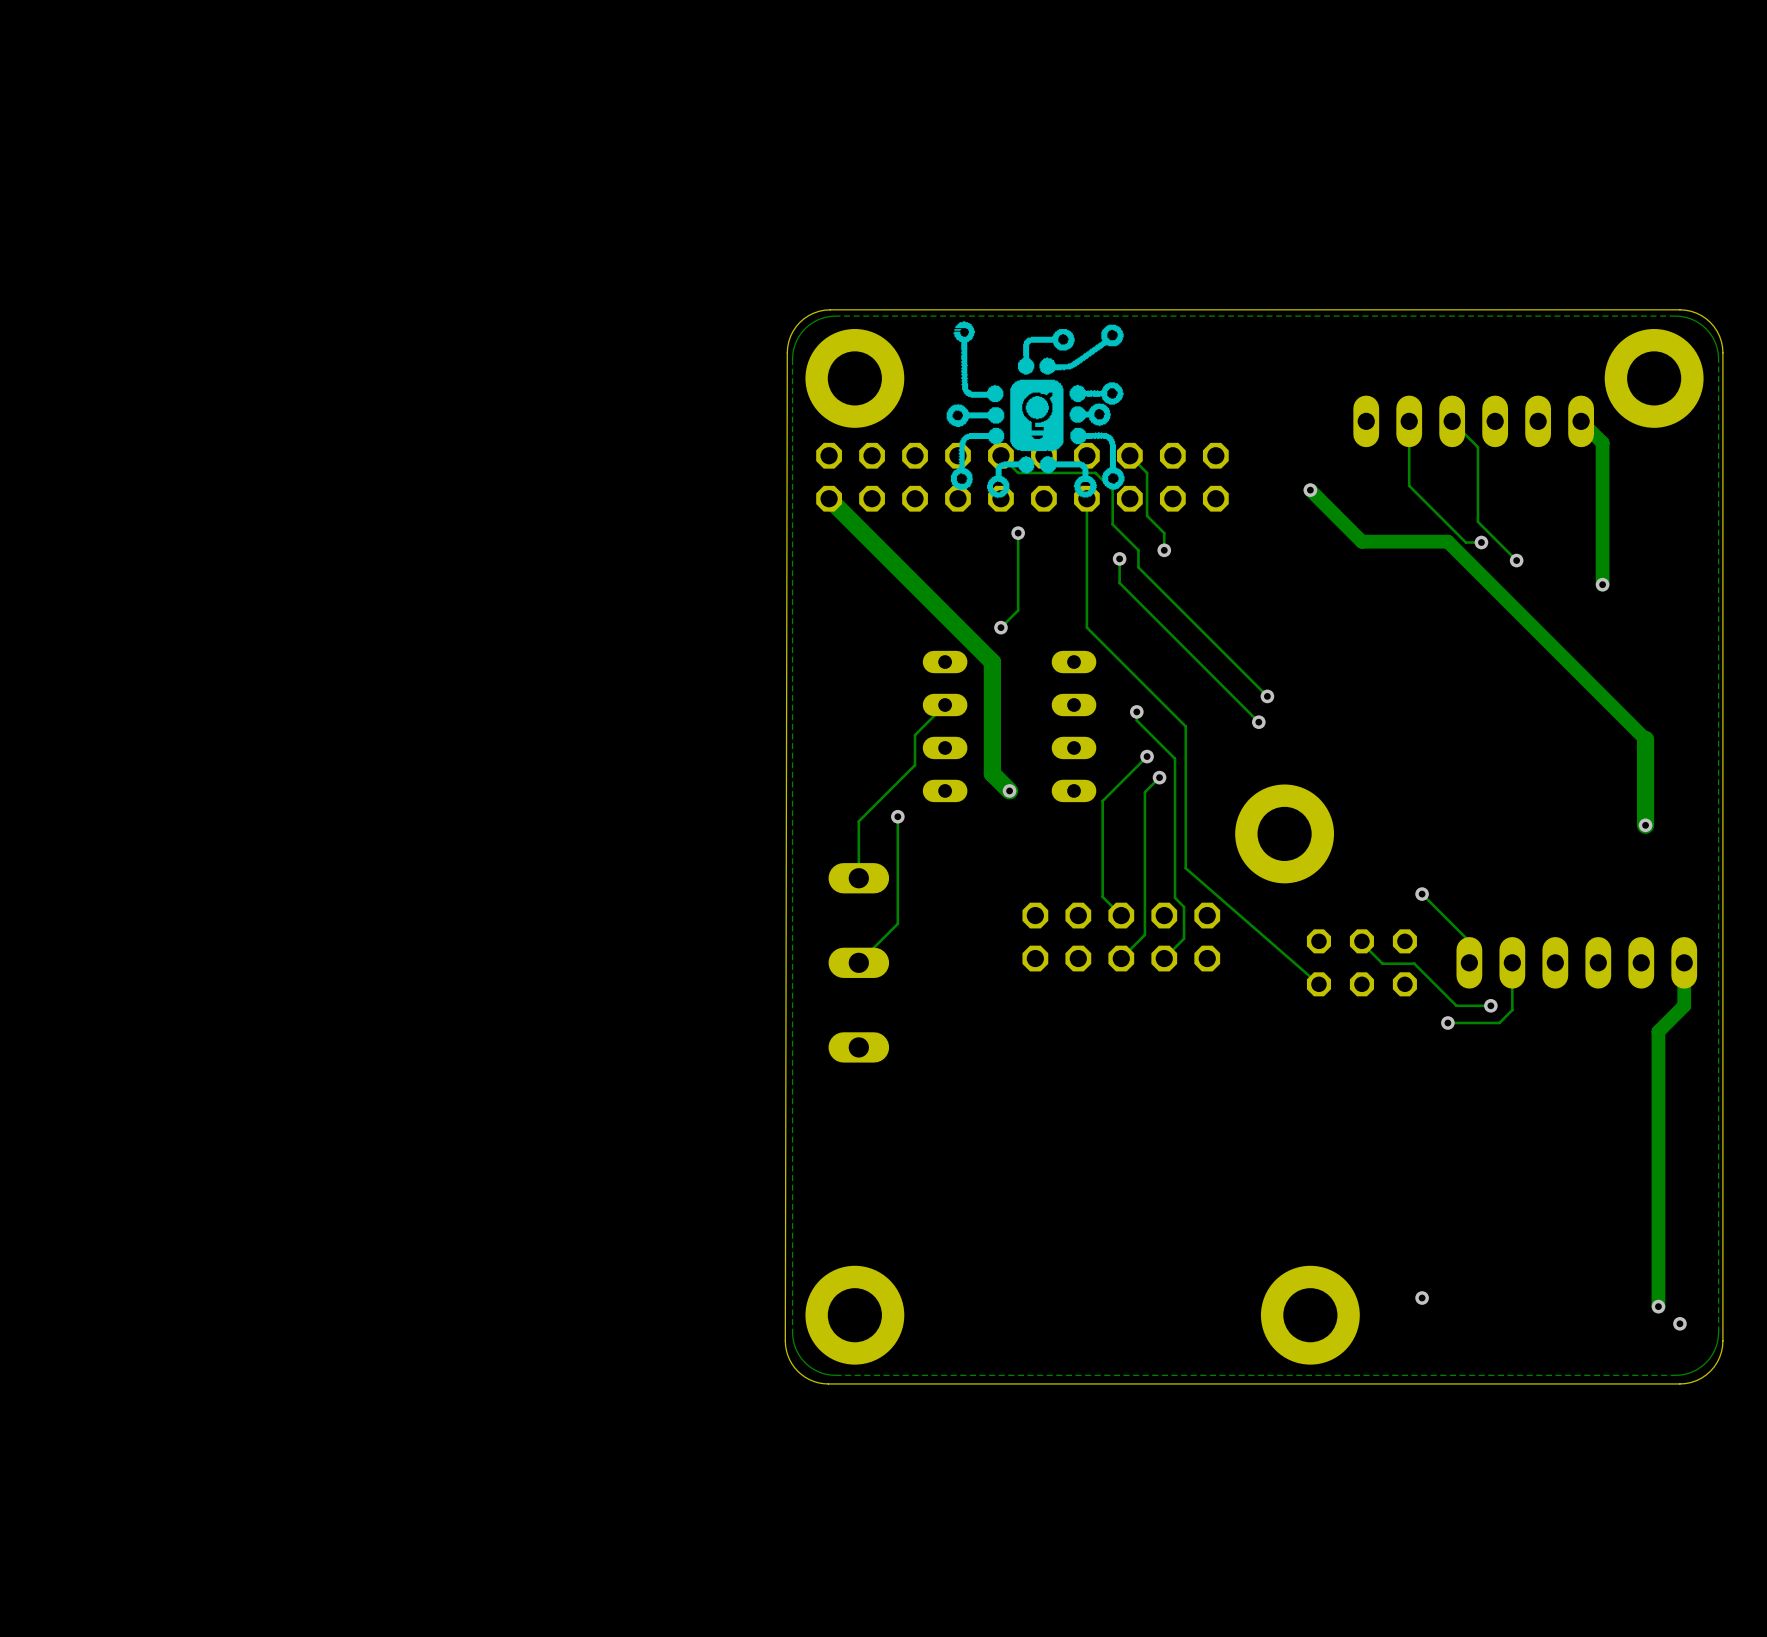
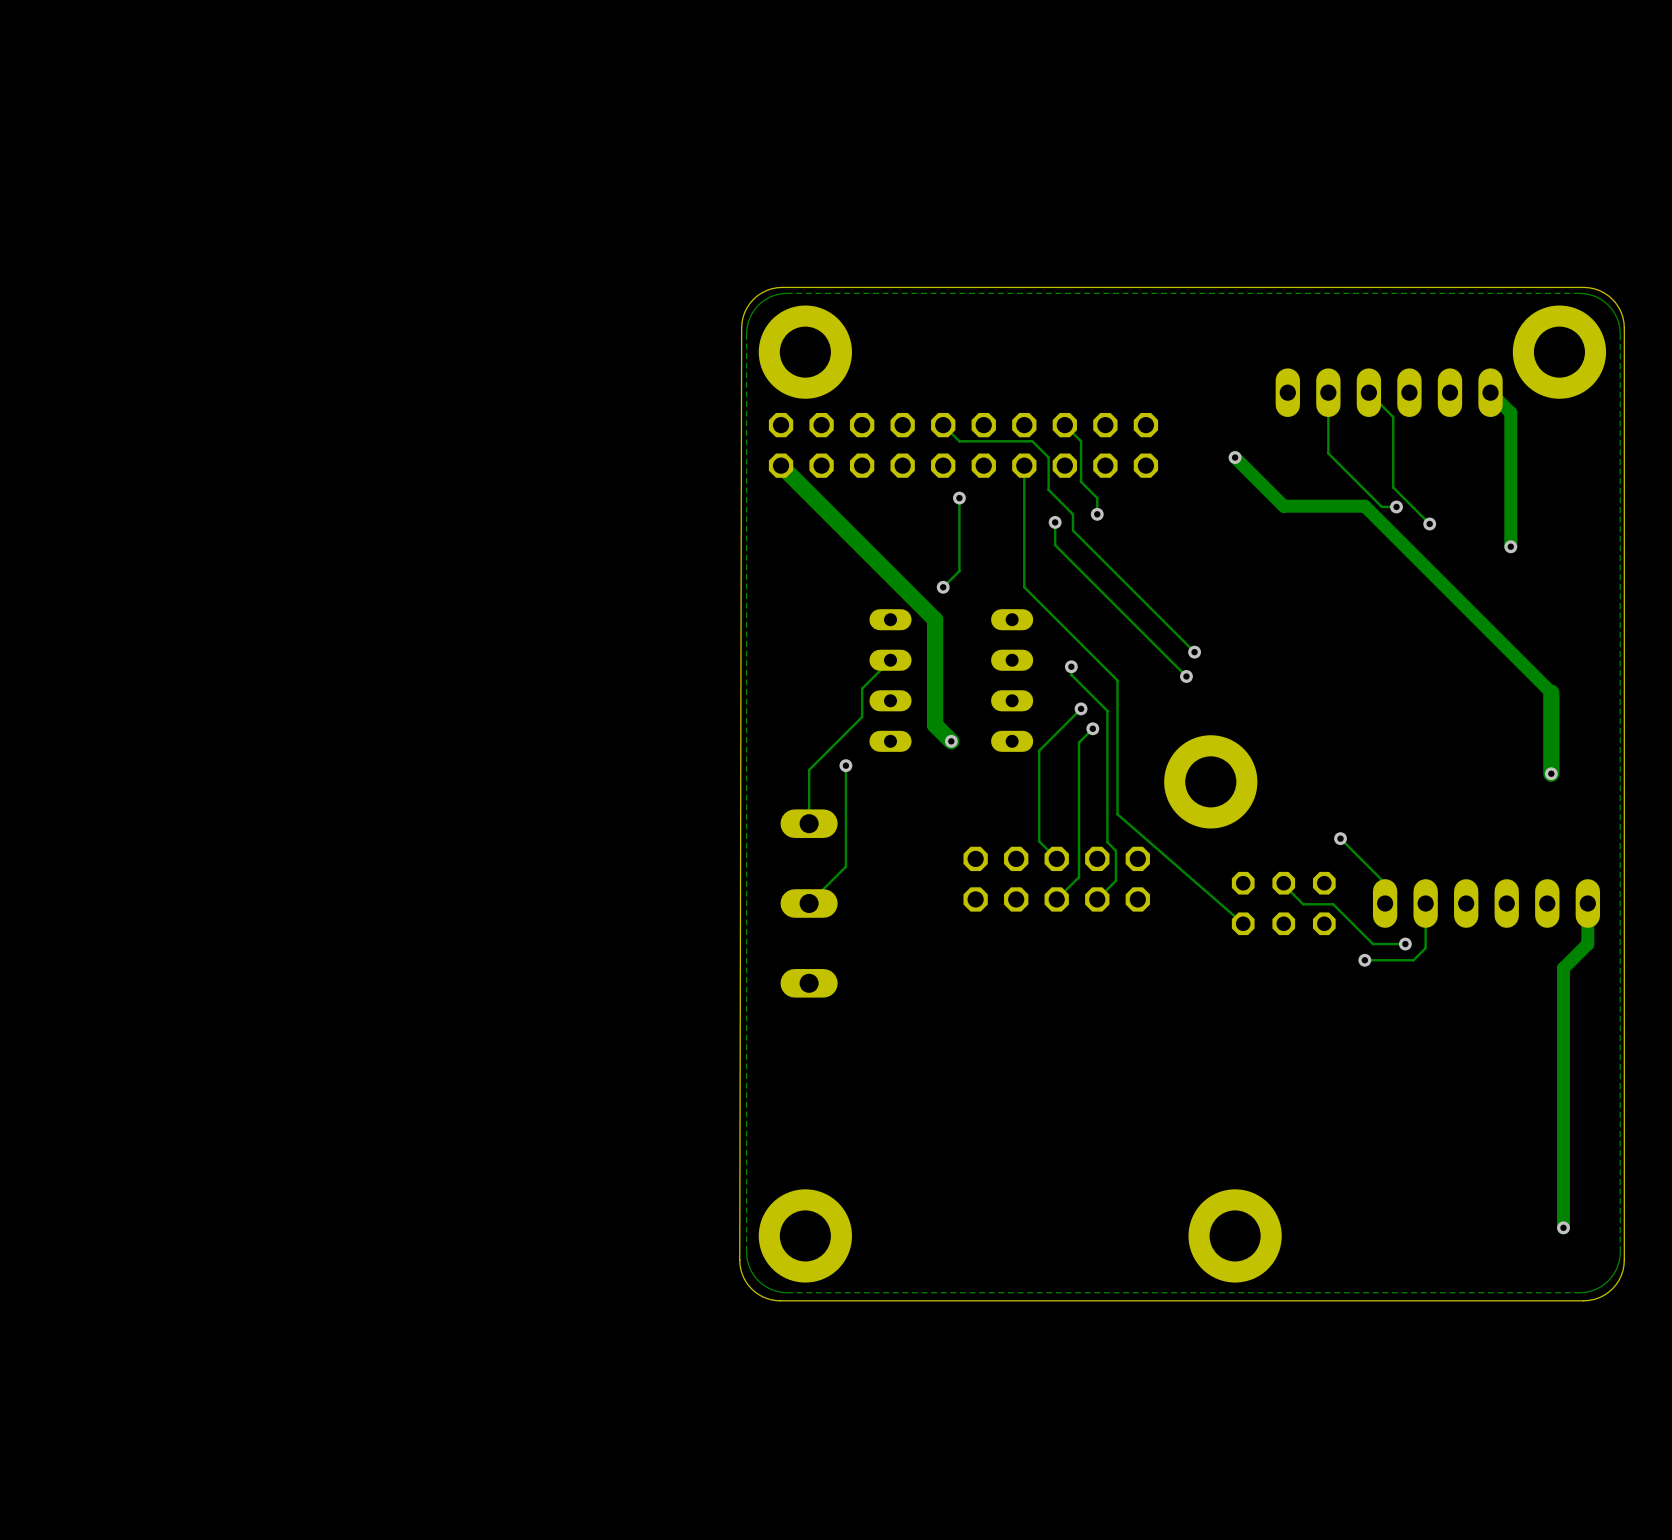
drawing: [946, 321, 1125, 499] -> none
via: (1422, 1298) -> none
via: (1679, 1323) -> none

